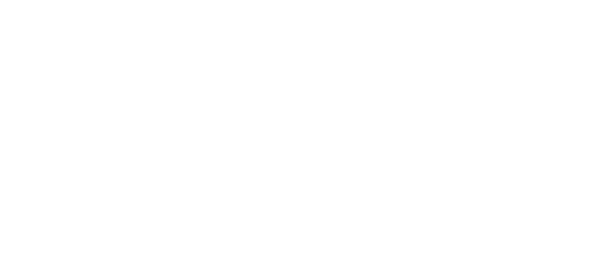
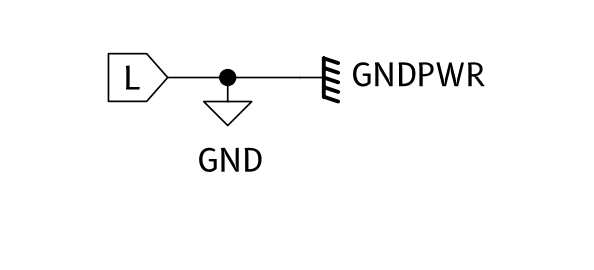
global label: none -> L (132, 77)
wire: none -> (167, 77) (299, 77)
junction: none -> (227, 77)
power symbol: none -> GNDPWR (319, 79)
power symbol: none -> GND (227, 101)

